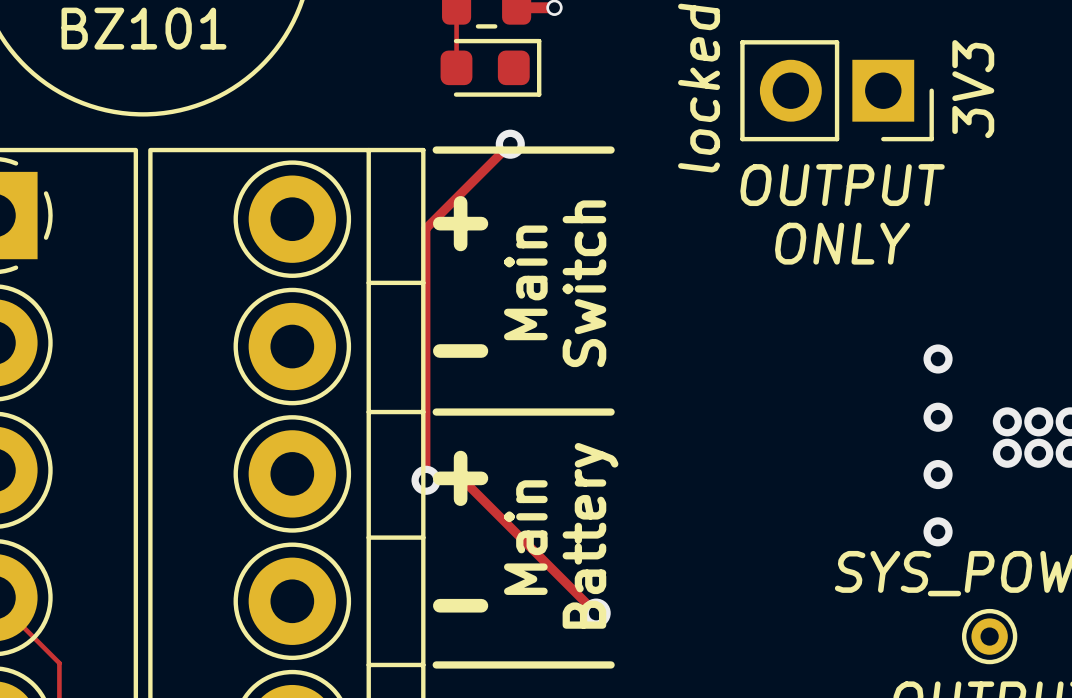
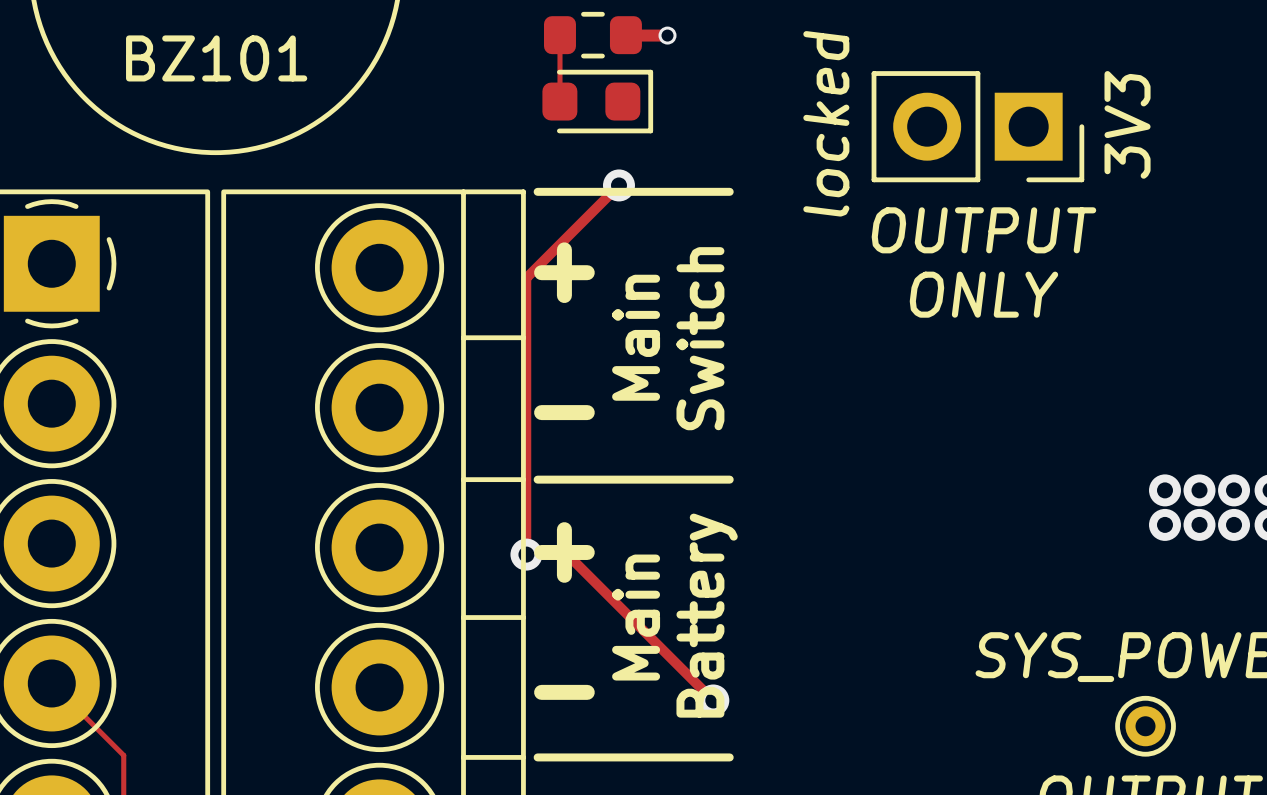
via: (938, 358) -> none
via: (938, 417) -> none
via: (938, 474) -> none
via: (938, 531) -> none

